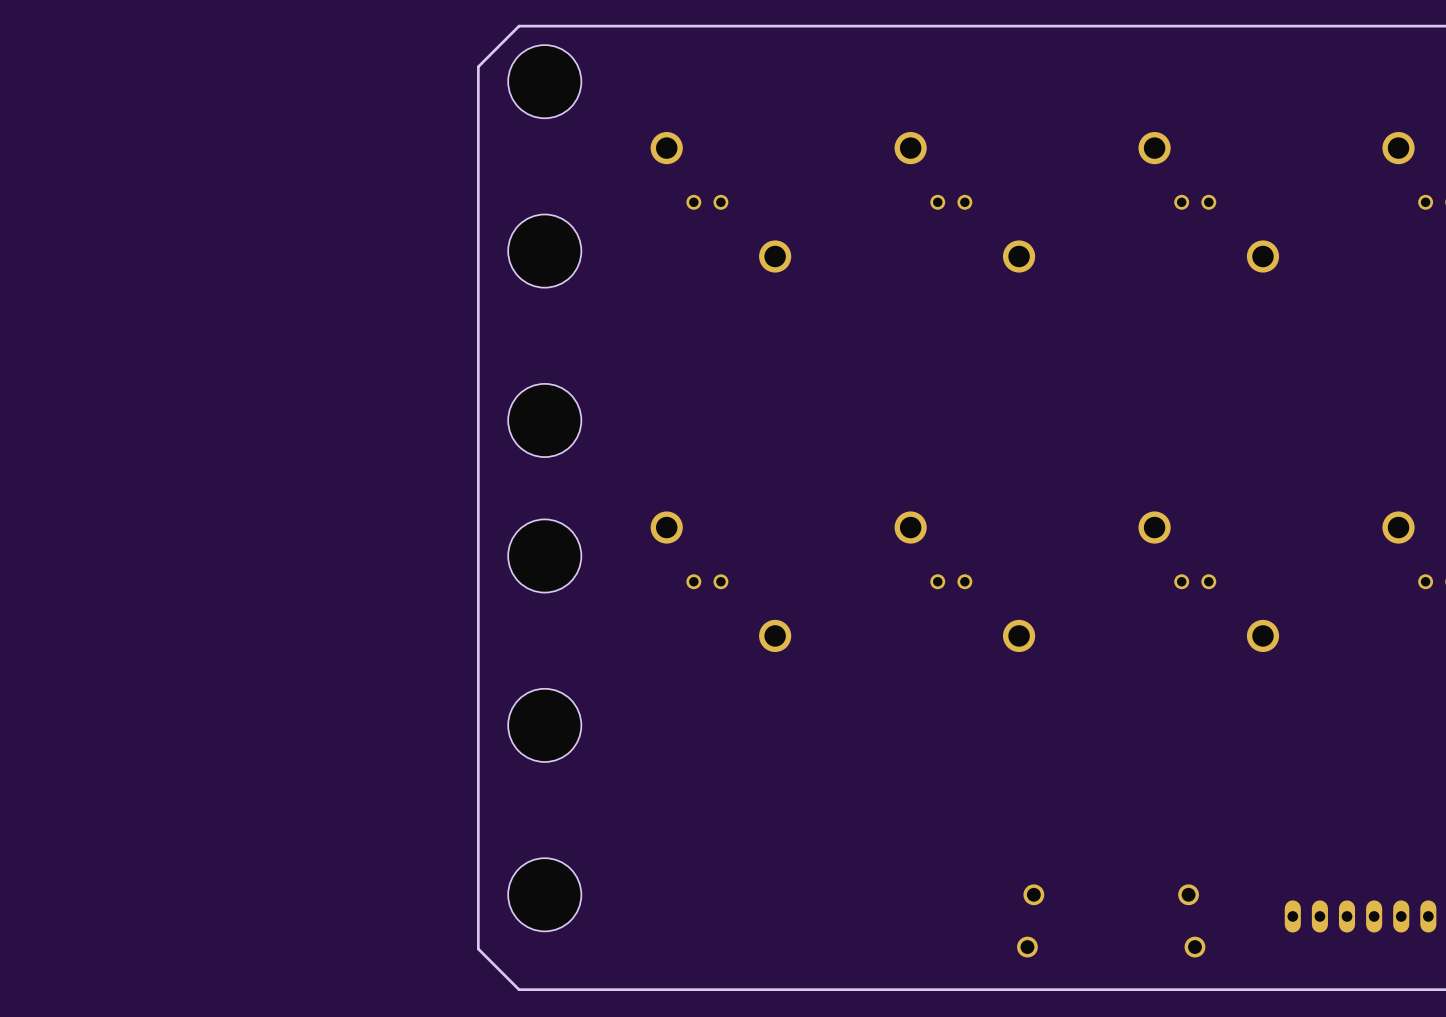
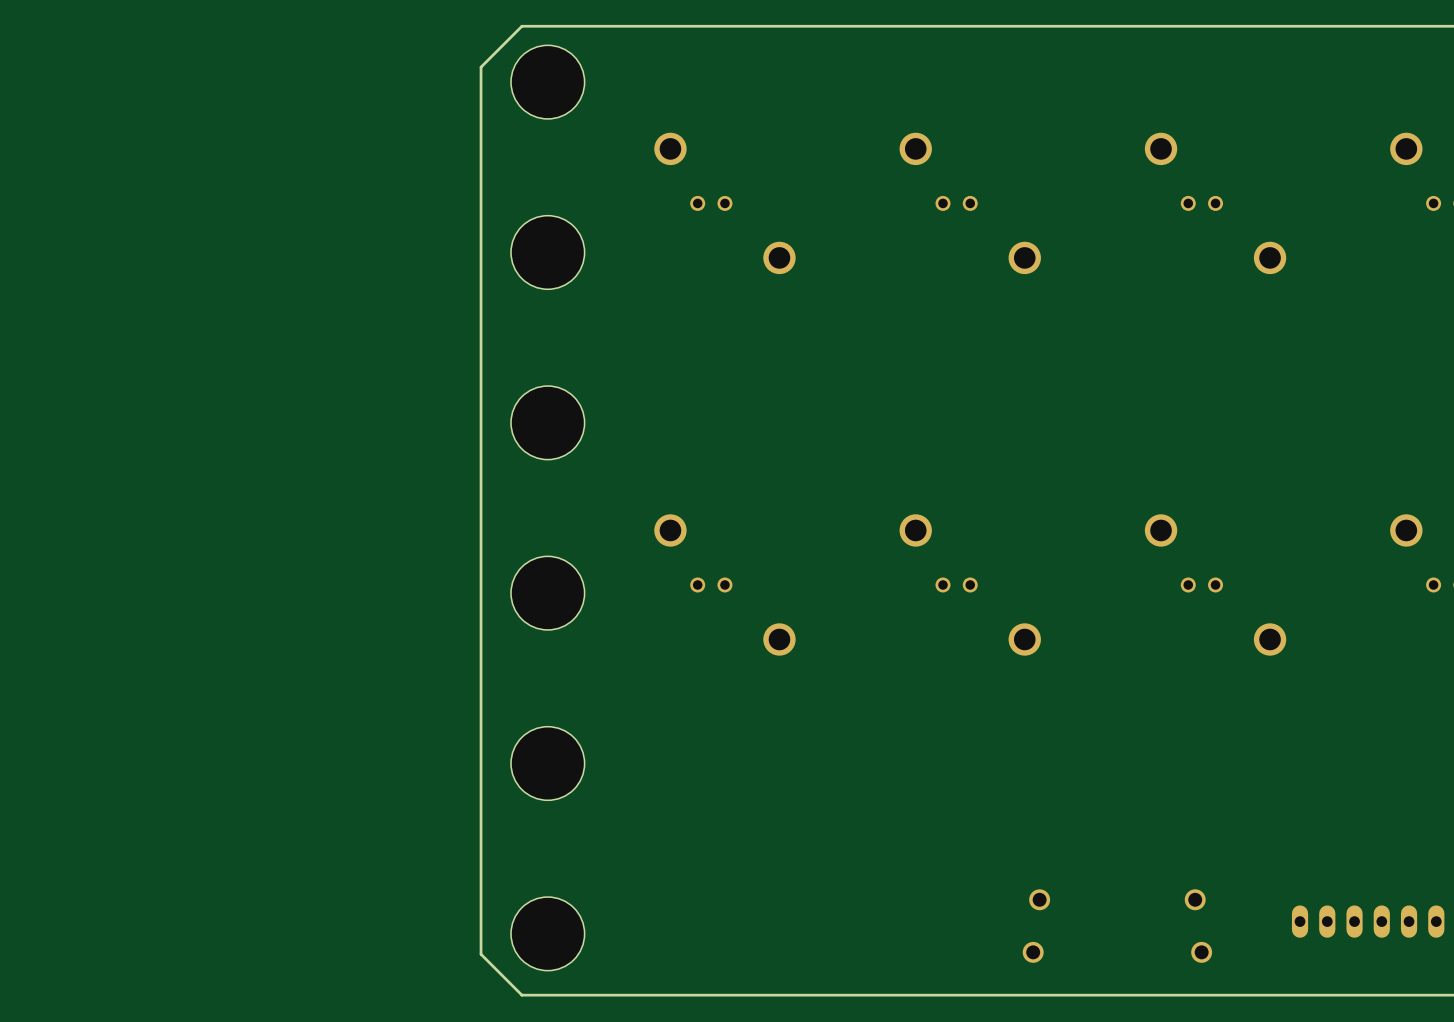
hole position: (544, 555) -> (547, 593)
hole position: (544, 725) -> (547, 763)
hole position: (544, 894) -> (547, 933)

